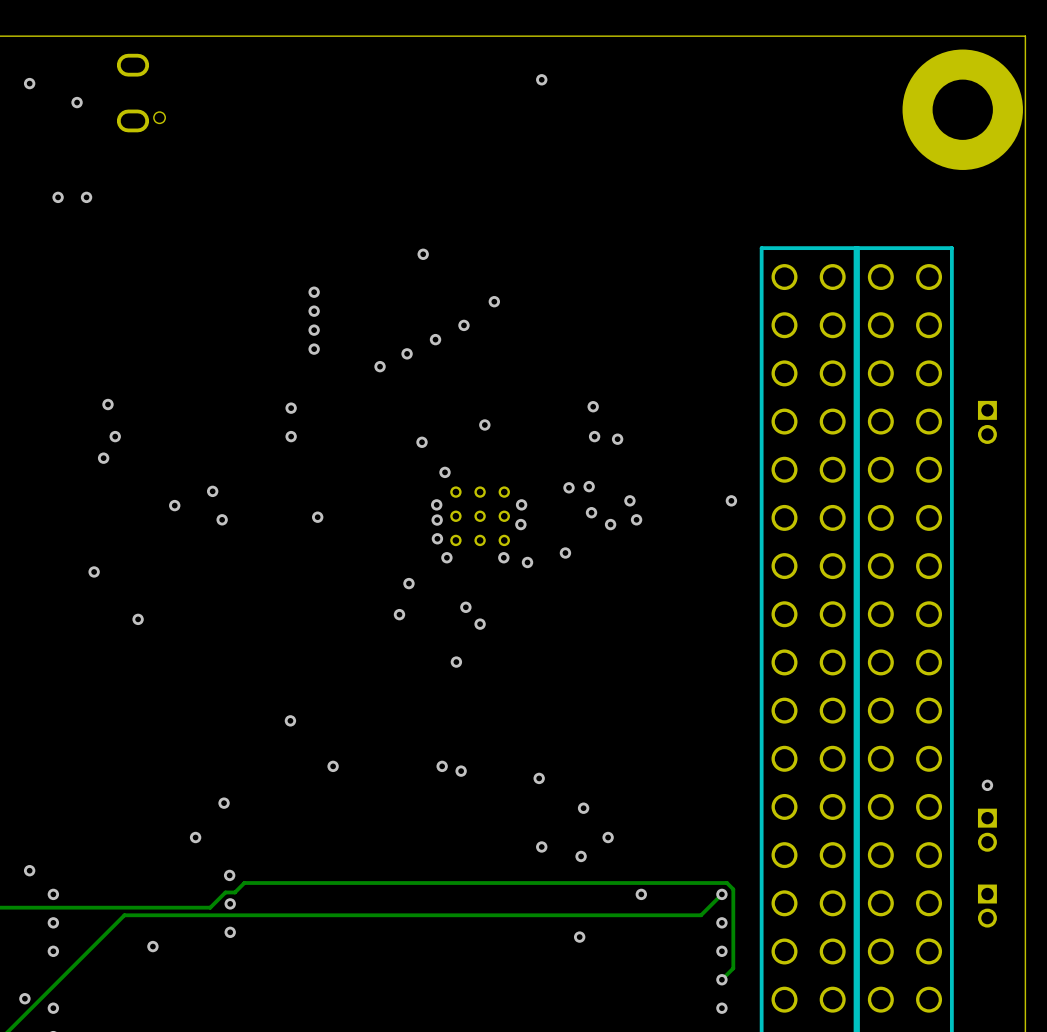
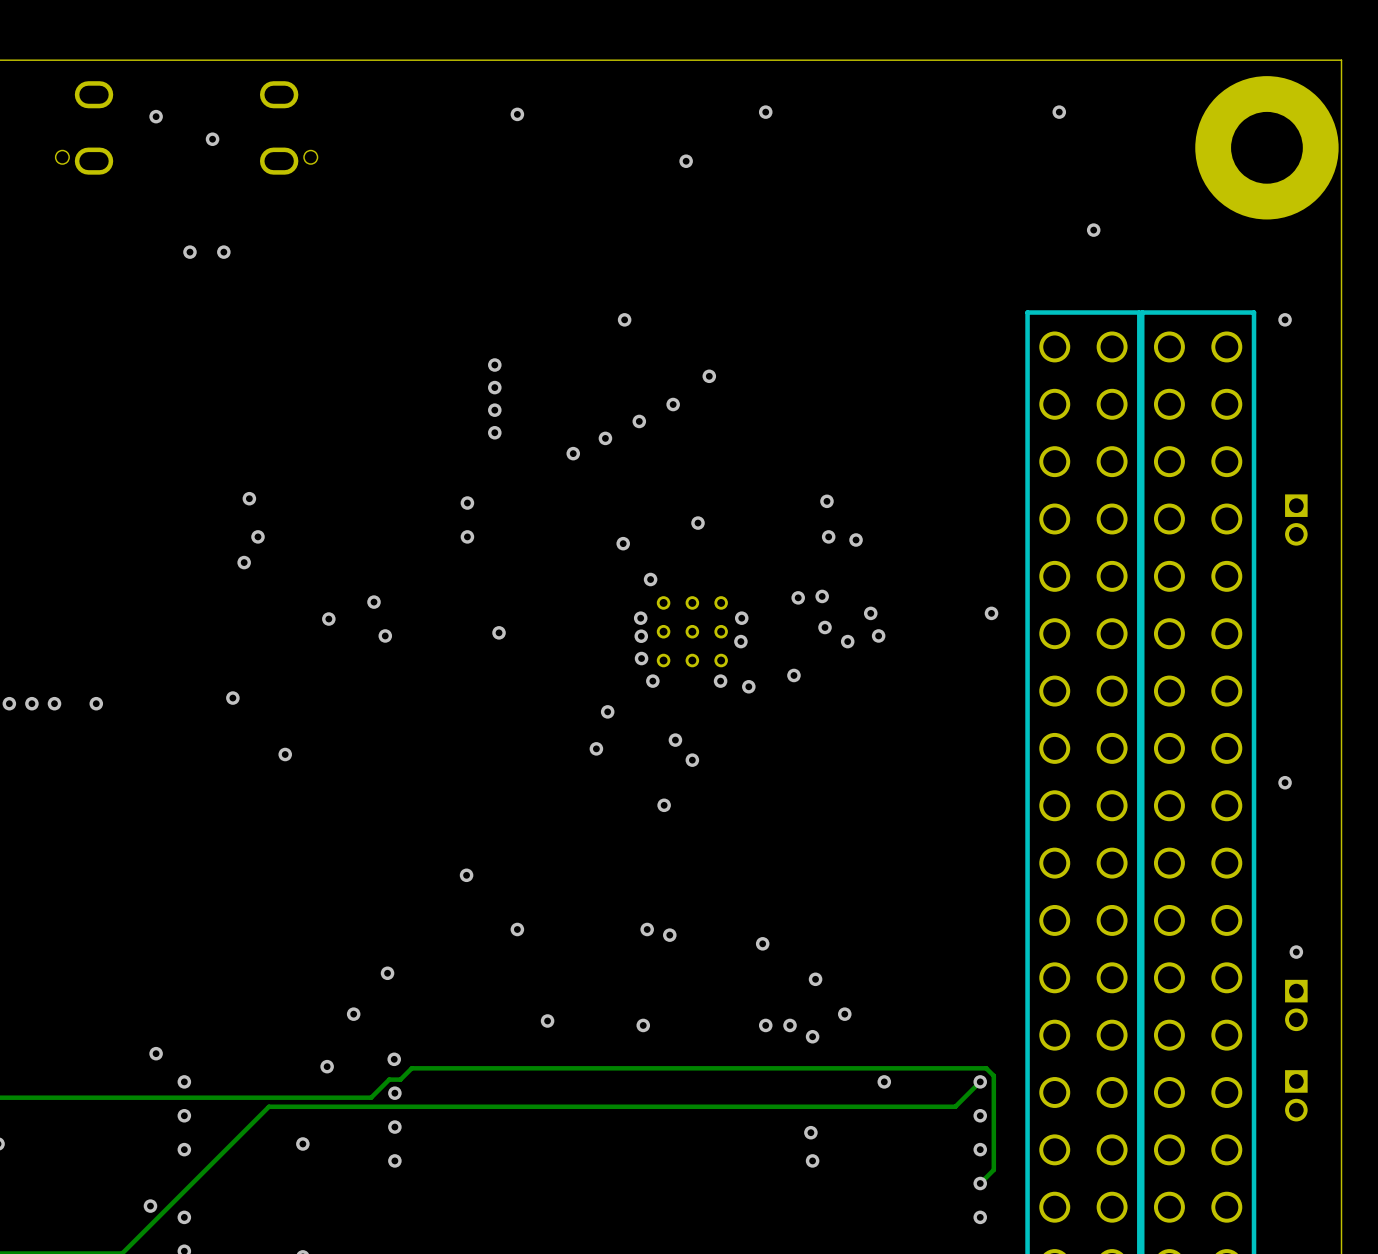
via: none -> (1059, 112)
via: none -> (517, 114)
via: none -> (686, 161)
via: none -> (1093, 230)
via: none -> (1285, 319)
via: none -> (1285, 782)
via: none -> (547, 1020)
via: none -> (643, 1025)
via: none -> (790, 1025)
via: none -> (327, 1066)
via: none -> (394, 1160)
via: none -> (812, 1160)

